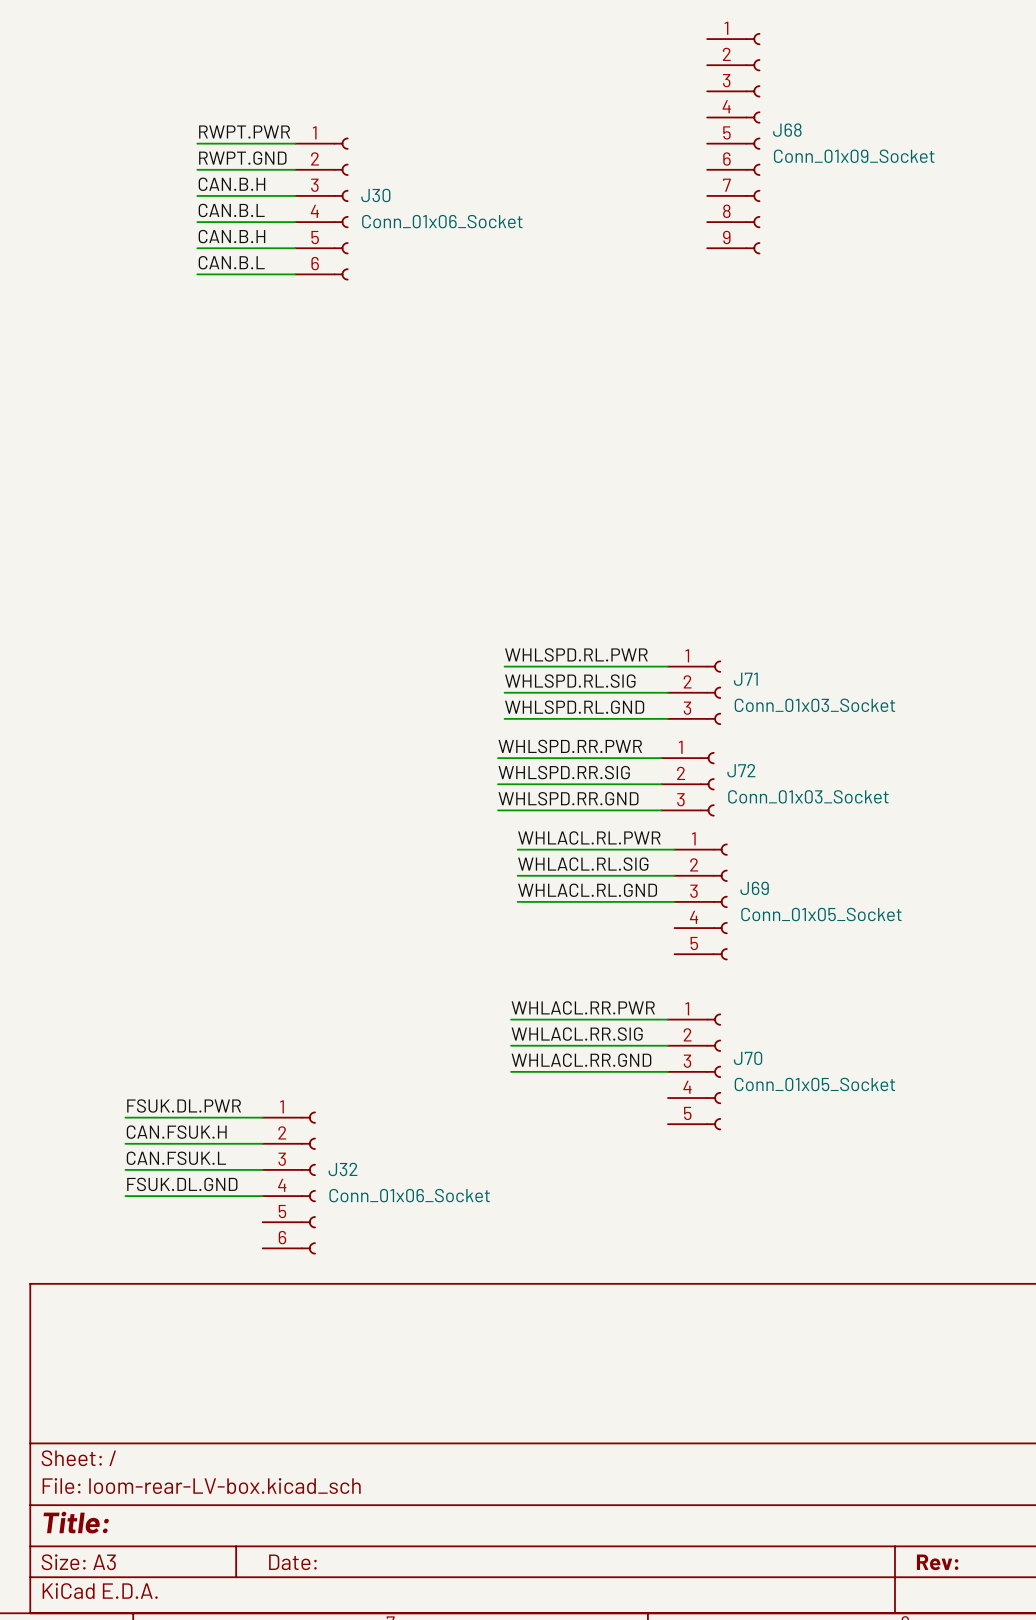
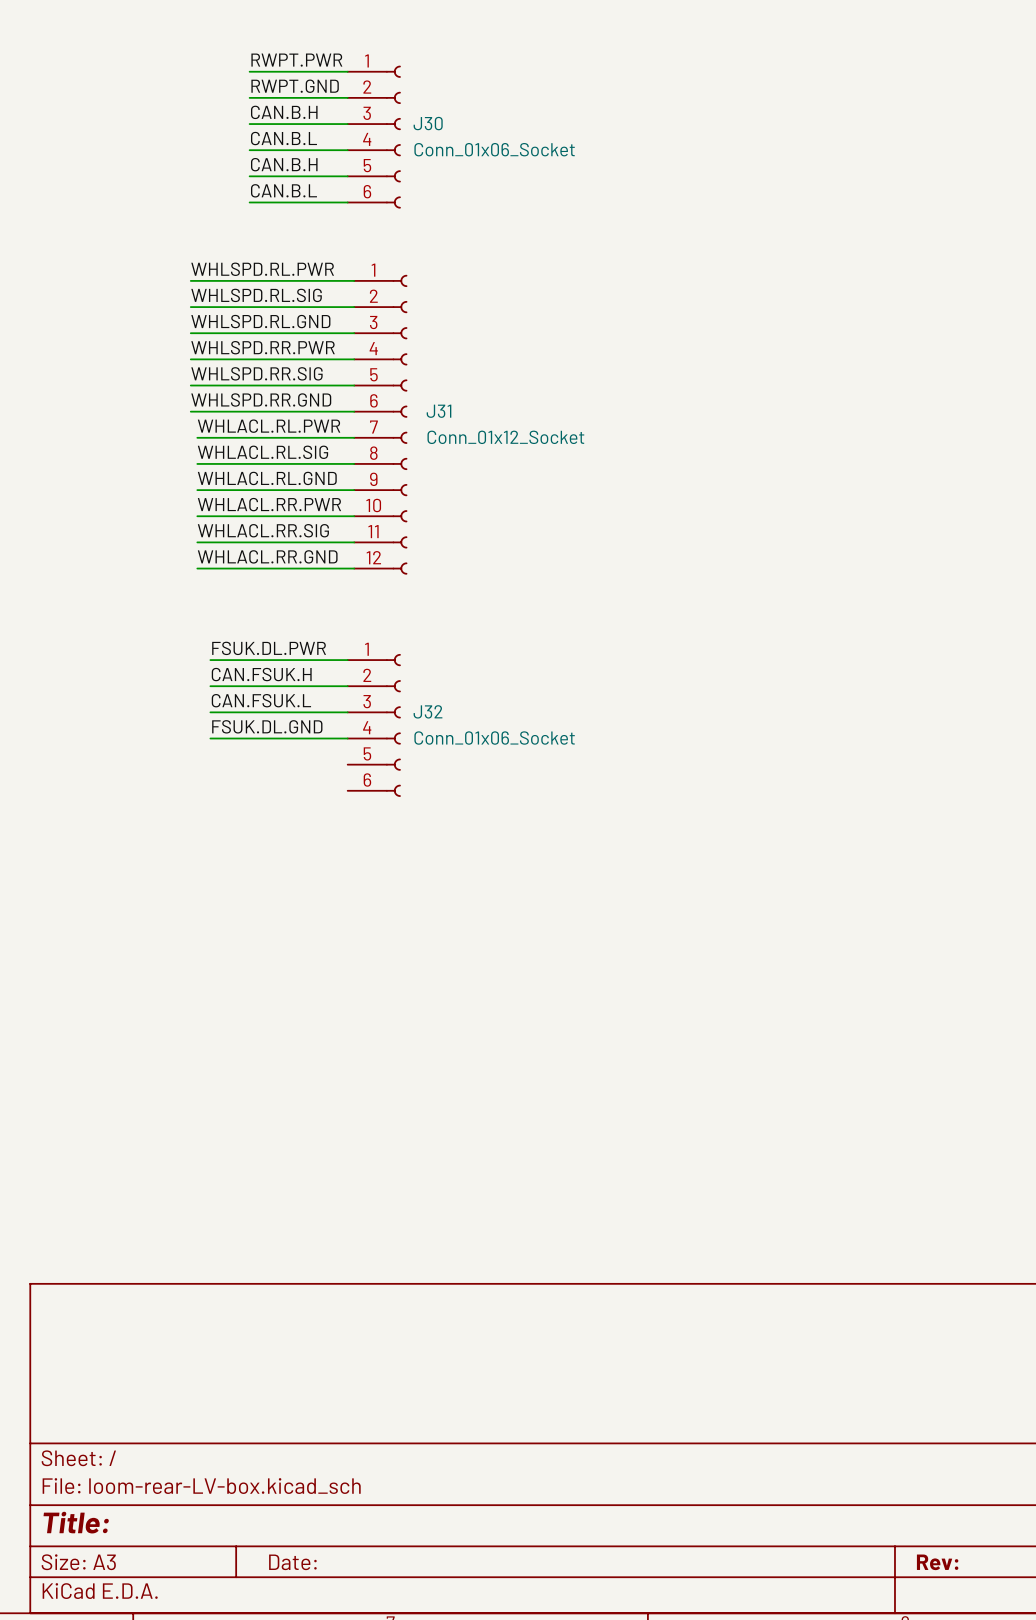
label: none -> CAN.B.H (284, 112)
label position: RWPT.PWR (244, 131) -> RWPT.PWR (296, 60)
label: none -> CAN.B.L (283, 138)
wire: (197, 143) (295, 143) -> (249, 71) (347, 71)
J68: Conn_01x09_Socket (733, 143) -> none
label position: RWPT.GND (242, 158) -> RWPT.GND (295, 86)
label: none -> CAN.B.H (284, 164)
wire: (197, 169) (295, 169) -> (249, 97) (347, 97)
label: CAN.B.H (231, 184) -> none
label: none -> CAN.B.L (283, 190)
wire: (197, 195) (295, 195) -> (249, 124) (347, 124)
J30 position: (321, 209) -> (374, 137)
label: CAN.B.L (231, 210) -> none
wire: (197, 222) (295, 222) -> (249, 150) (347, 150)
label: CAN.B.H (231, 236) -> none
wire: (197, 248) (295, 248) -> (249, 176) (347, 176)
label: CAN.B.L (231, 262) -> WHLSPD.RL.PWR (262, 269)
wire: (197, 274) (295, 274) -> (249, 202) (347, 202)
wire: none -> (190, 280) (354, 280)
label: none -> WHLSPD.RL.SIG (256, 295)
wire: none -> (190, 307) (354, 307)
label: none -> WHLSPD.RL.GND (260, 321)
wire: none -> (190, 333) (354, 333)
label: none -> WHLSPD.RR.PWR (263, 347)
wire: none -> (190, 359) (354, 359)
label: none -> WHLSPD.RR.SIG (256, 373)
wire: none -> (190, 385) (354, 385)
label: none -> WHLSPD.RR.GND (261, 399)
wire: none -> (190, 411) (354, 411)
J31: none -> Conn_01x12_Socket (380, 424)
label: none -> WHLACL.RL.PWR (269, 426)
wire: none -> (197, 437) (354, 437)
label: none -> WHLACL.RL.SIG (262, 452)
wire: none -> (197, 463) (354, 463)
label: none -> WHLACL.RL.GND (267, 478)
wire: none -> (197, 490) (354, 490)
label: none -> WHLACL.RR.PWR (269, 504)
wire: none -> (197, 516) (354, 516)
label: none -> WHLACL.RR.SIG (263, 530)
wire: none -> (197, 542) (354, 542)
label: none -> WHLACL.RR.GND (267, 556)
wire: none -> (197, 568) (354, 568)
label: none -> FSUK.DL.PWR (269, 648)
label: WHLSPD.RL.PWR (576, 654) -> none
wire: none -> (210, 660) (347, 660)
wire: (504, 666) (668, 666) -> none
label: none -> CAN.FSUK.H (261, 674)
label: WHLSPD.RL.SIG (570, 681) -> none
wire: none -> (210, 686) (347, 686)
wire: (504, 692) (668, 692) -> none
J71: Conn_01x03_Socket (694, 692) -> none
label: none -> CAN.FSUK.L (261, 700)
label: WHLSPD.RL.GND (574, 707) -> none
wire: none -> (210, 712) (347, 712)
wire: (504, 718) (668, 718) -> none
label: none -> FSUK.DL.GND (267, 726)
wire: none -> (210, 738) (347, 738)
label: WHLSPD.RR.PWR (570, 746) -> none
wire: (498, 758) (661, 758) -> none
label: WHLSPD.RR.SIG (564, 772) -> none
wire: (498, 784) (661, 784) -> none
J72: Conn_01x03_Socket (688, 784) -> none
label: WHLSPD.RR.GND (568, 798) -> none
wire: (498, 810) (661, 810) -> none
label: WHLACL.RL.PWR (589, 837) -> none
wire: (517, 849) (674, 849) -> none
label: WHLACL.RL.SIG (583, 864) -> none
wire: (517, 875) (674, 875) -> none
label: WHLACL.RL.GND (587, 890) -> none
wire: (517, 901) (674, 901) -> none
J69: Conn_01x05_Socket (701, 901) -> none
label: WHLACL.RR.PWR (583, 1007) -> none
wire: (511, 1019) (668, 1019) -> none
label: WHLACL.RR.SIG (577, 1034) -> none
wire: (511, 1045) (668, 1045) -> none
label: WHLACL.RR.GND (581, 1060) -> none
wire: (511, 1071) (668, 1071) -> none
J70: Conn_01x05_Socket (694, 1071) -> none
label: FSUK.DL.PWR (184, 1105) -> none
wire: (125, 1117) (262, 1117) -> none
label: CAN.FSUK.H (176, 1132) -> none
wire: (125, 1143) (262, 1143) -> none
label: CAN.FSUK.L (176, 1158) -> none
wire: (125, 1169) (262, 1169) -> none
J32 position: (289, 1183) -> (374, 725)
label: FSUK.DL.GND (182, 1184) -> none
wire: (125, 1196) (262, 1196) -> none

